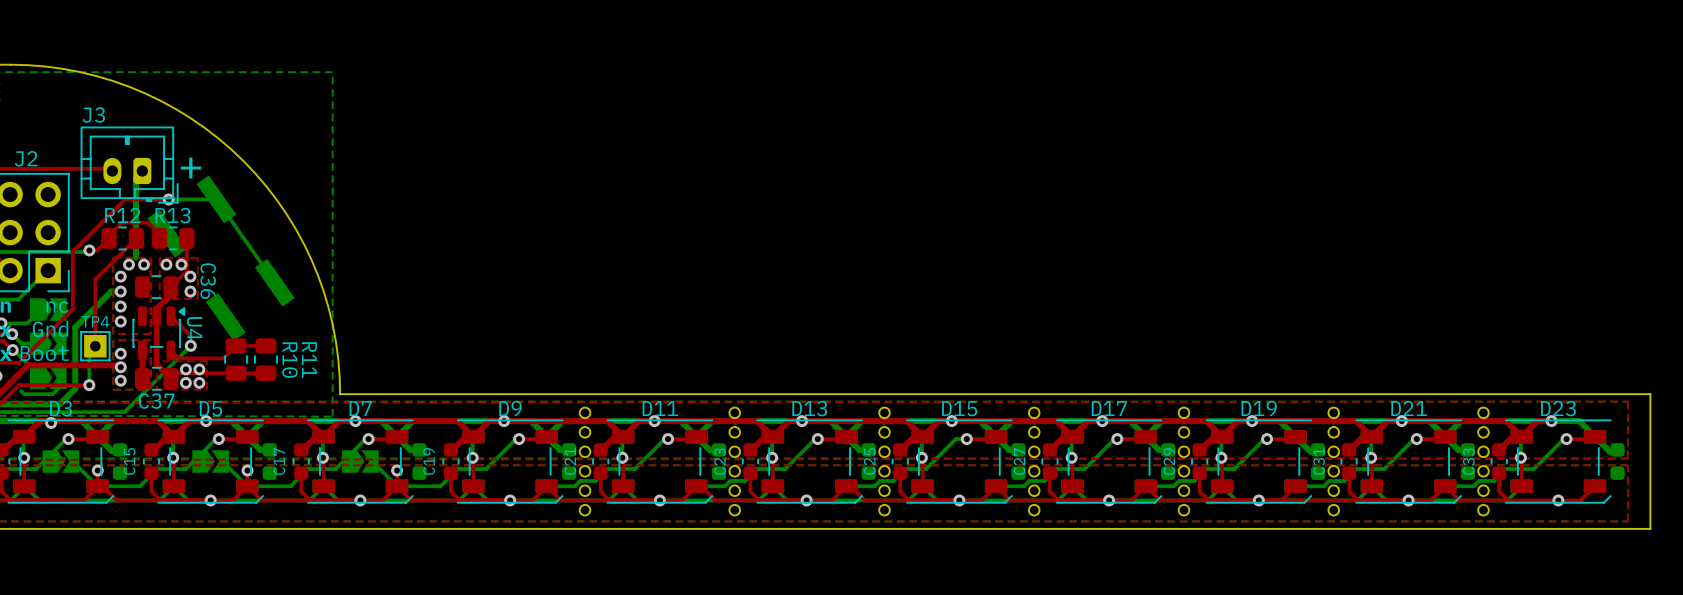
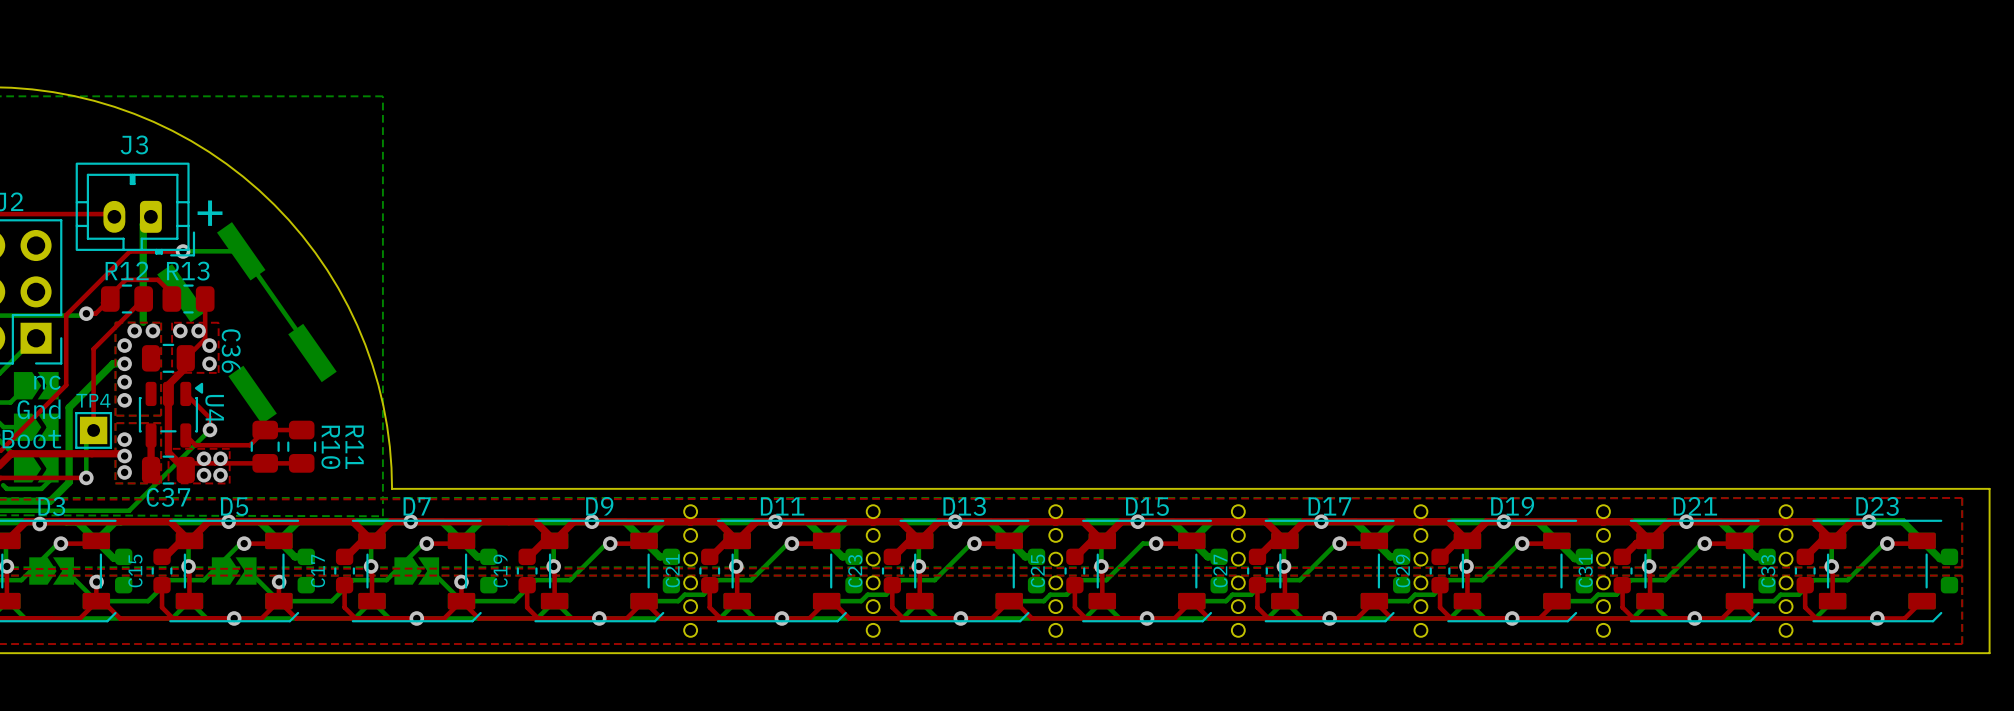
J3 name position: J3 (93, 115) -> J3 (134, 144)

